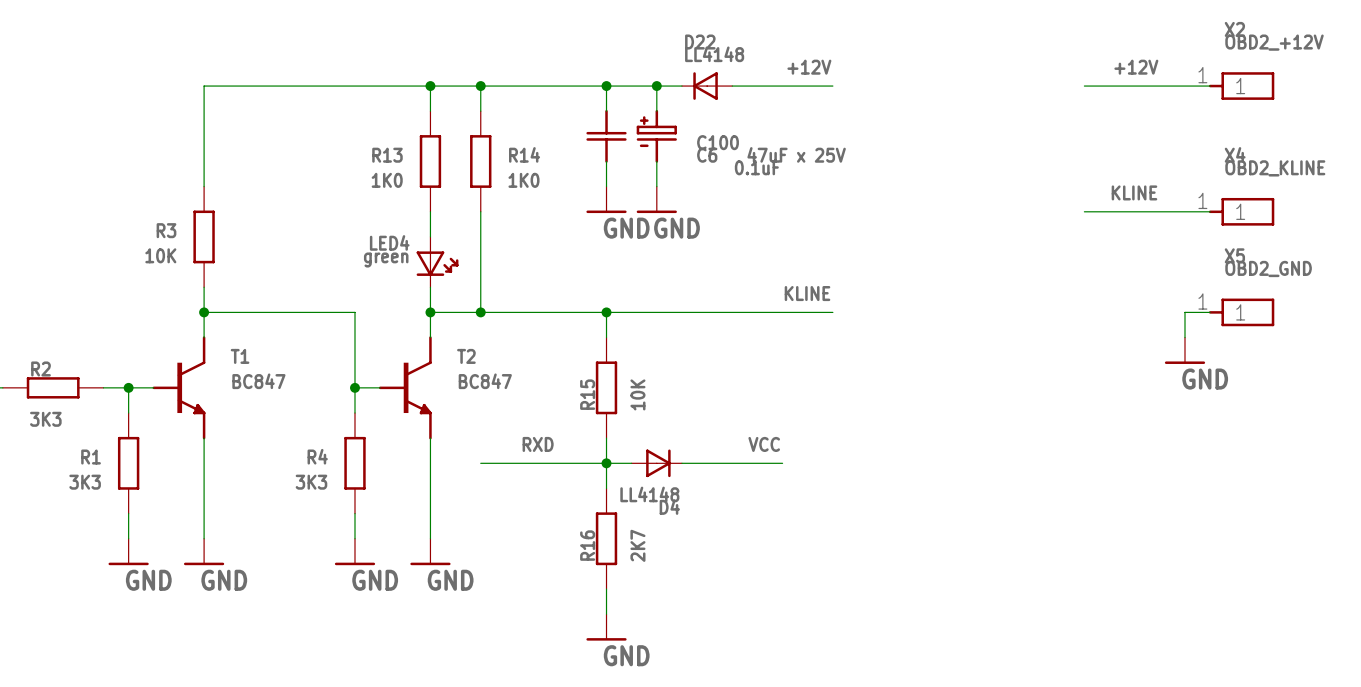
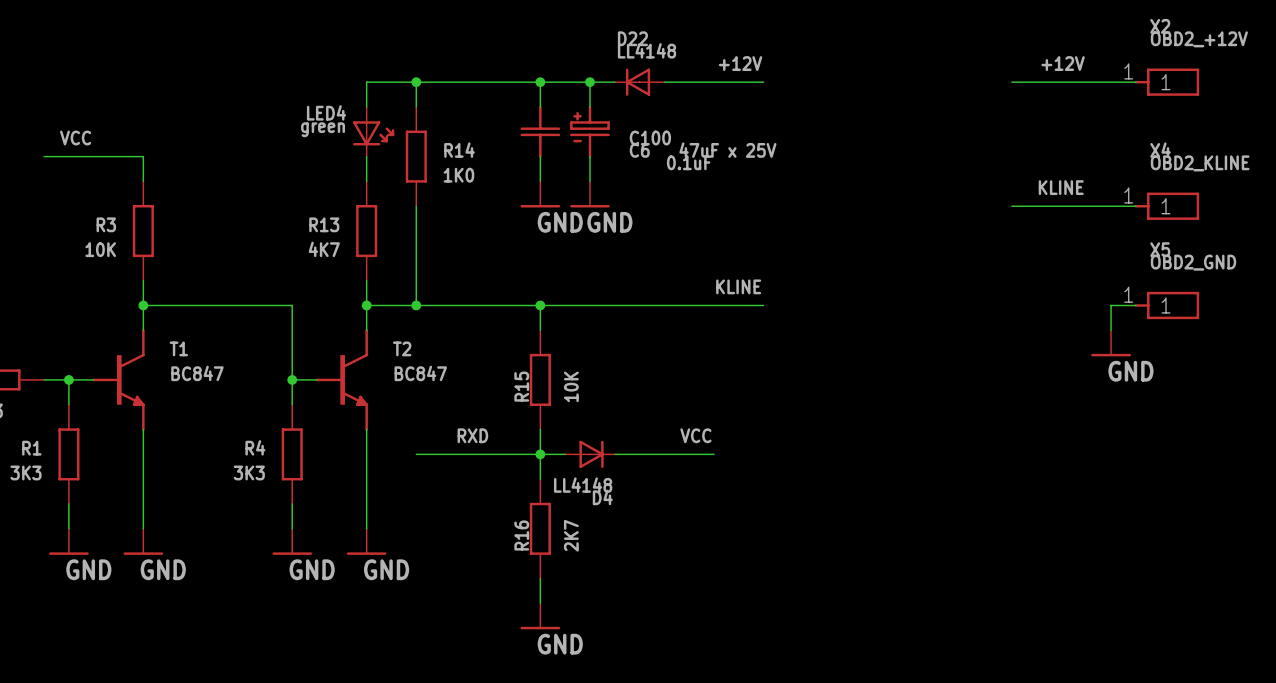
wire: (430, 86) (204, 86) (204, 161) -> (44, 156) (143, 156)
junction: (430, 86) -> none
label: none -> VCC (75, 138)
R13 position: (430, 161) -> (366, 231)
R13 value: 1K0 (387, 180) -> 4K7 (324, 249)
wire: (430, 211) (430, 236) -> (366, 156) (366, 181)
LED4 position: (437, 262) -> (373, 131)

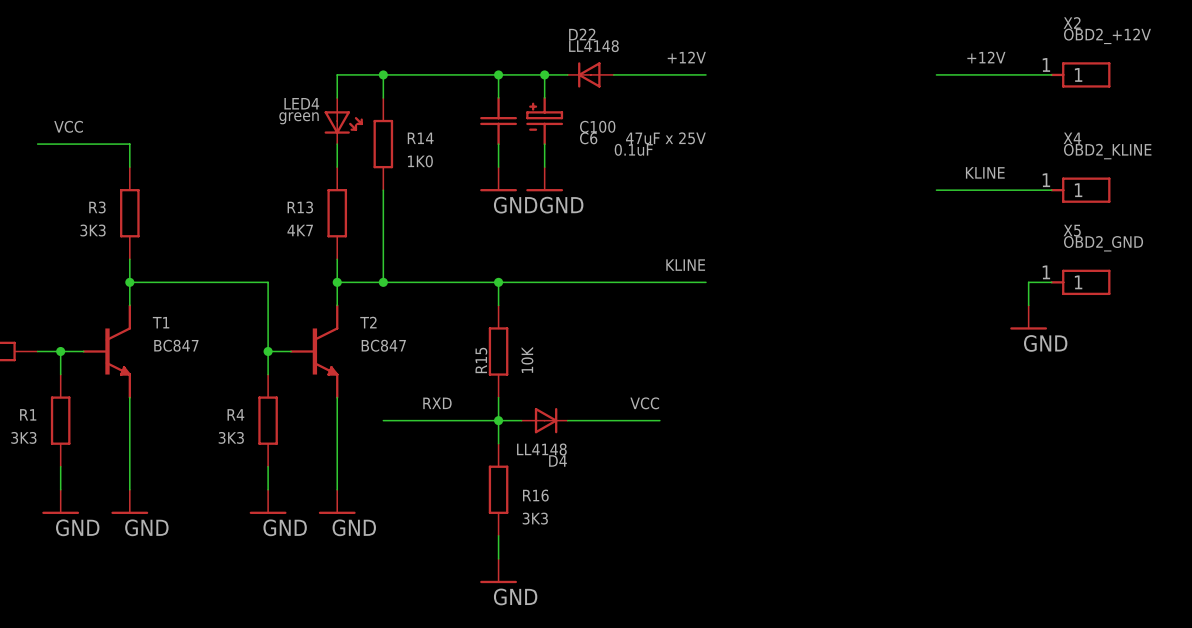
R3 value: 10K (100, 249) -> 3K3 (93, 230)
R16 name rotation: 0° (521, 535) -> 90° clockwise (535, 495)
R16 name position: R16 (521, 535) -> R16 (535, 495)
R16 value: 2K7 (571, 535) -> 3K3 (535, 518)

